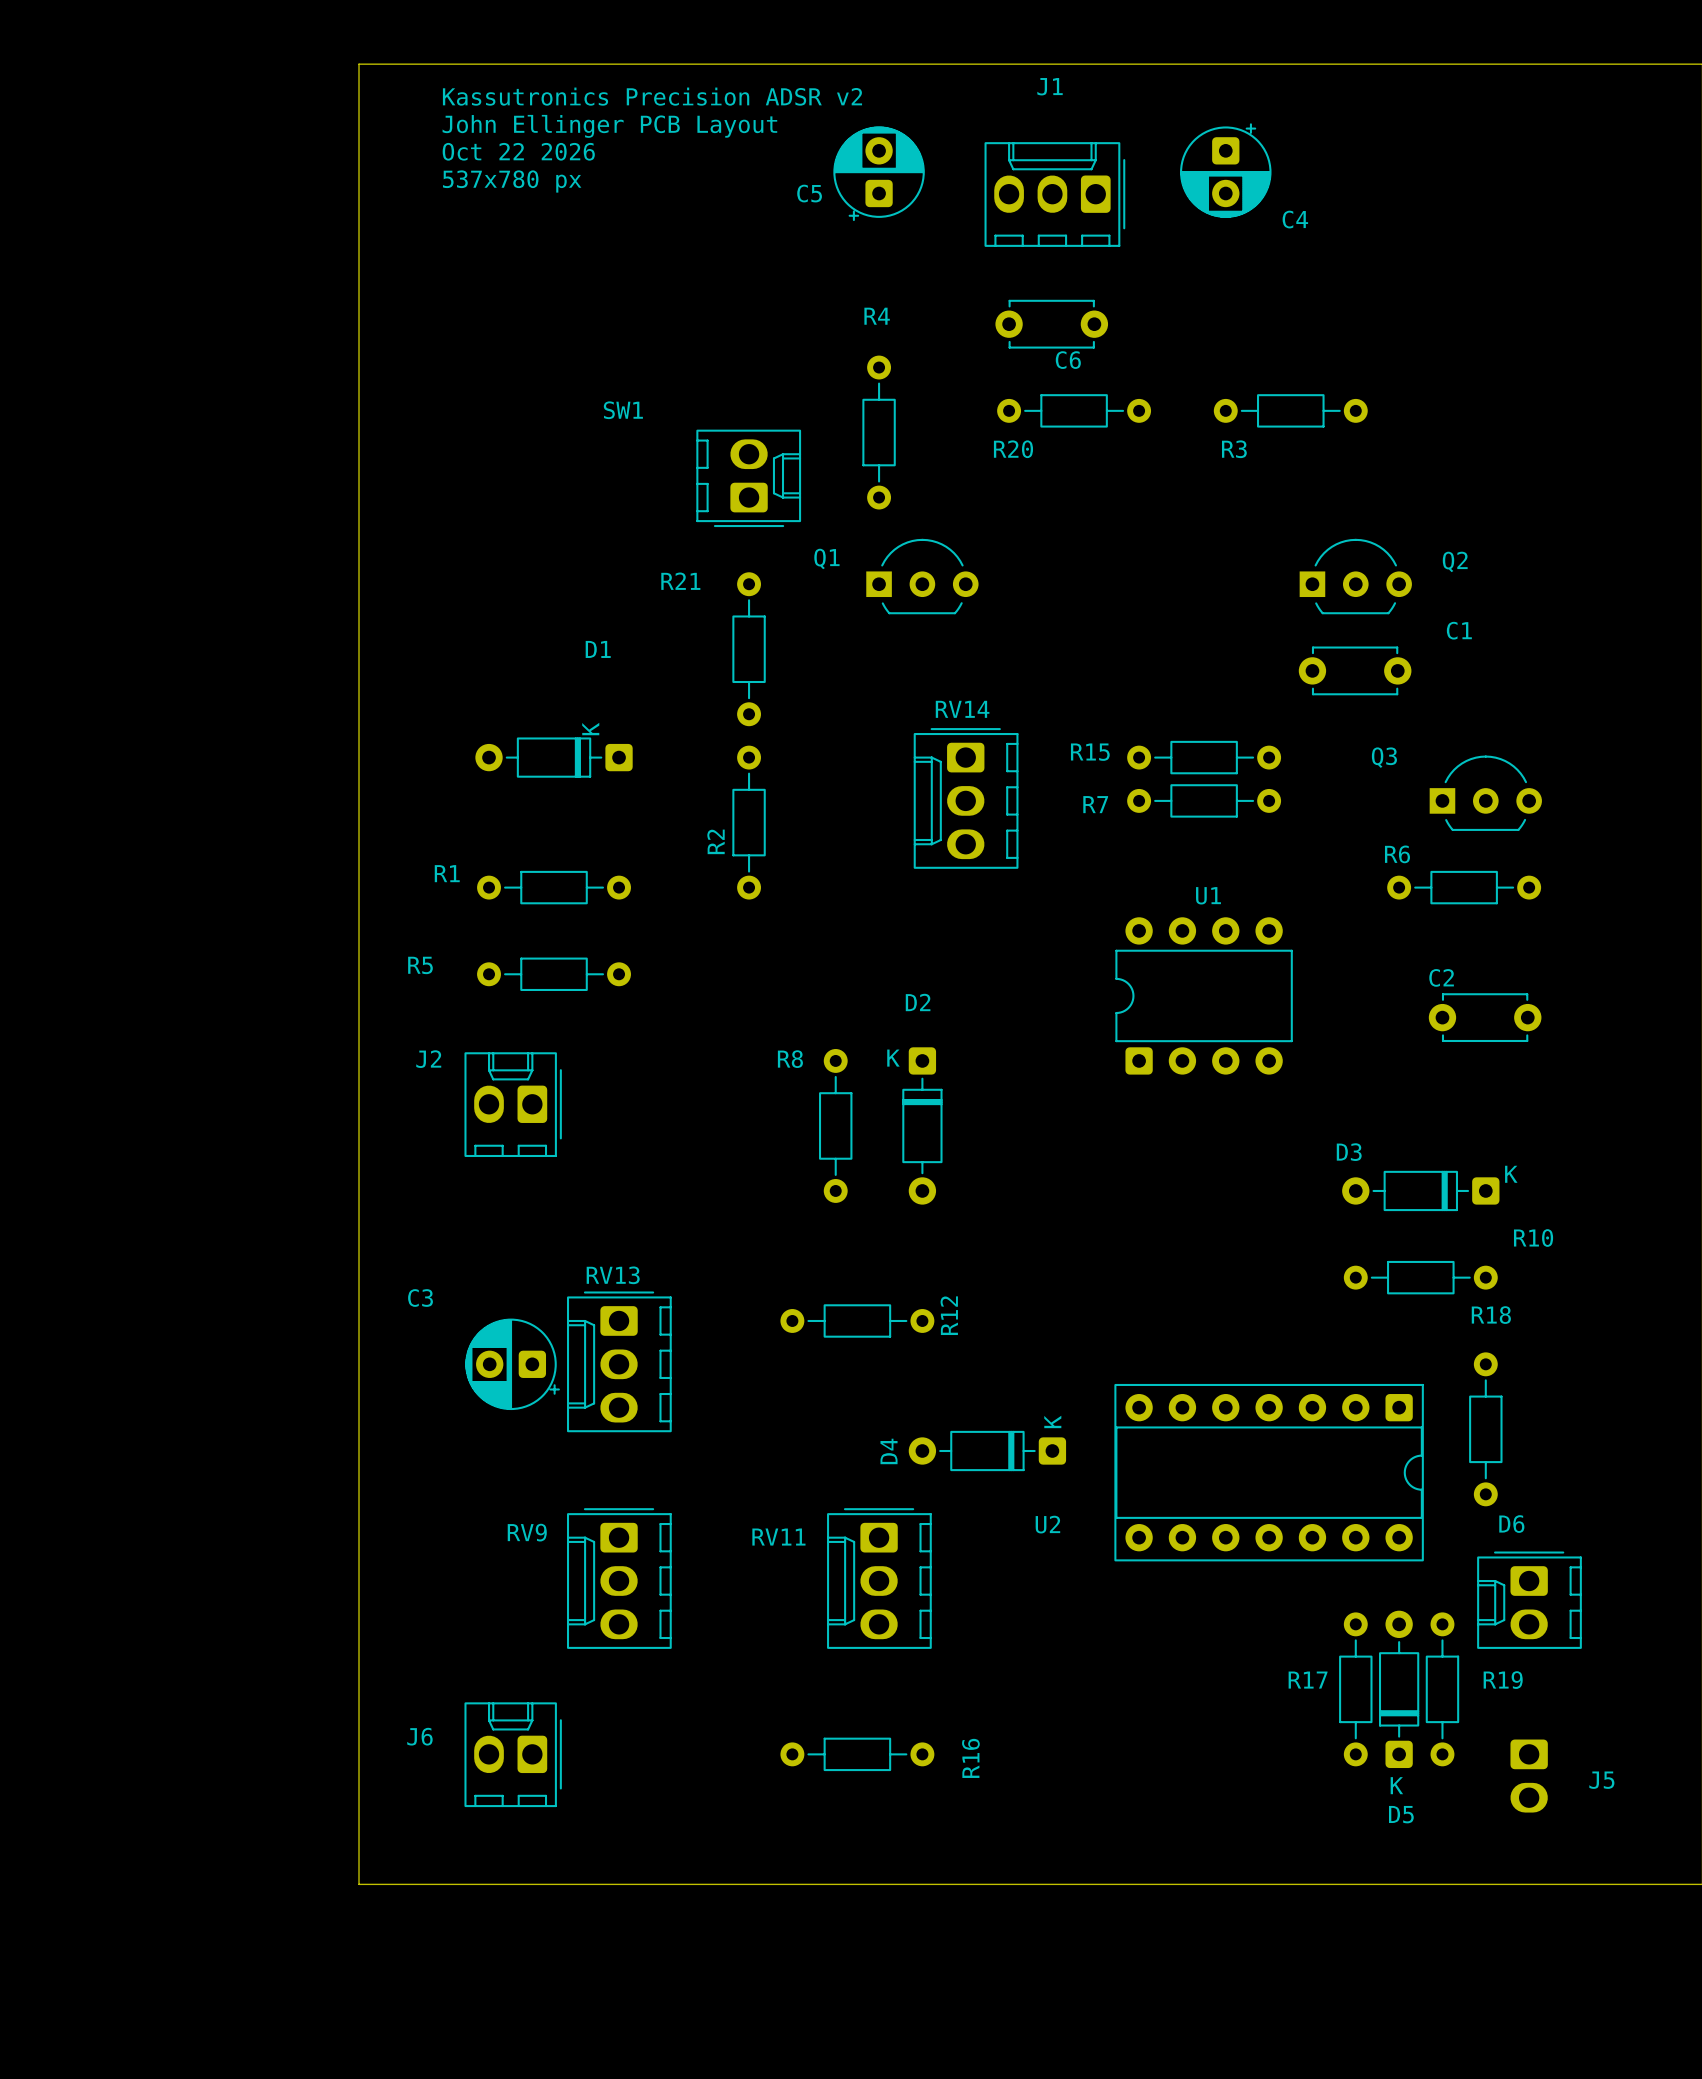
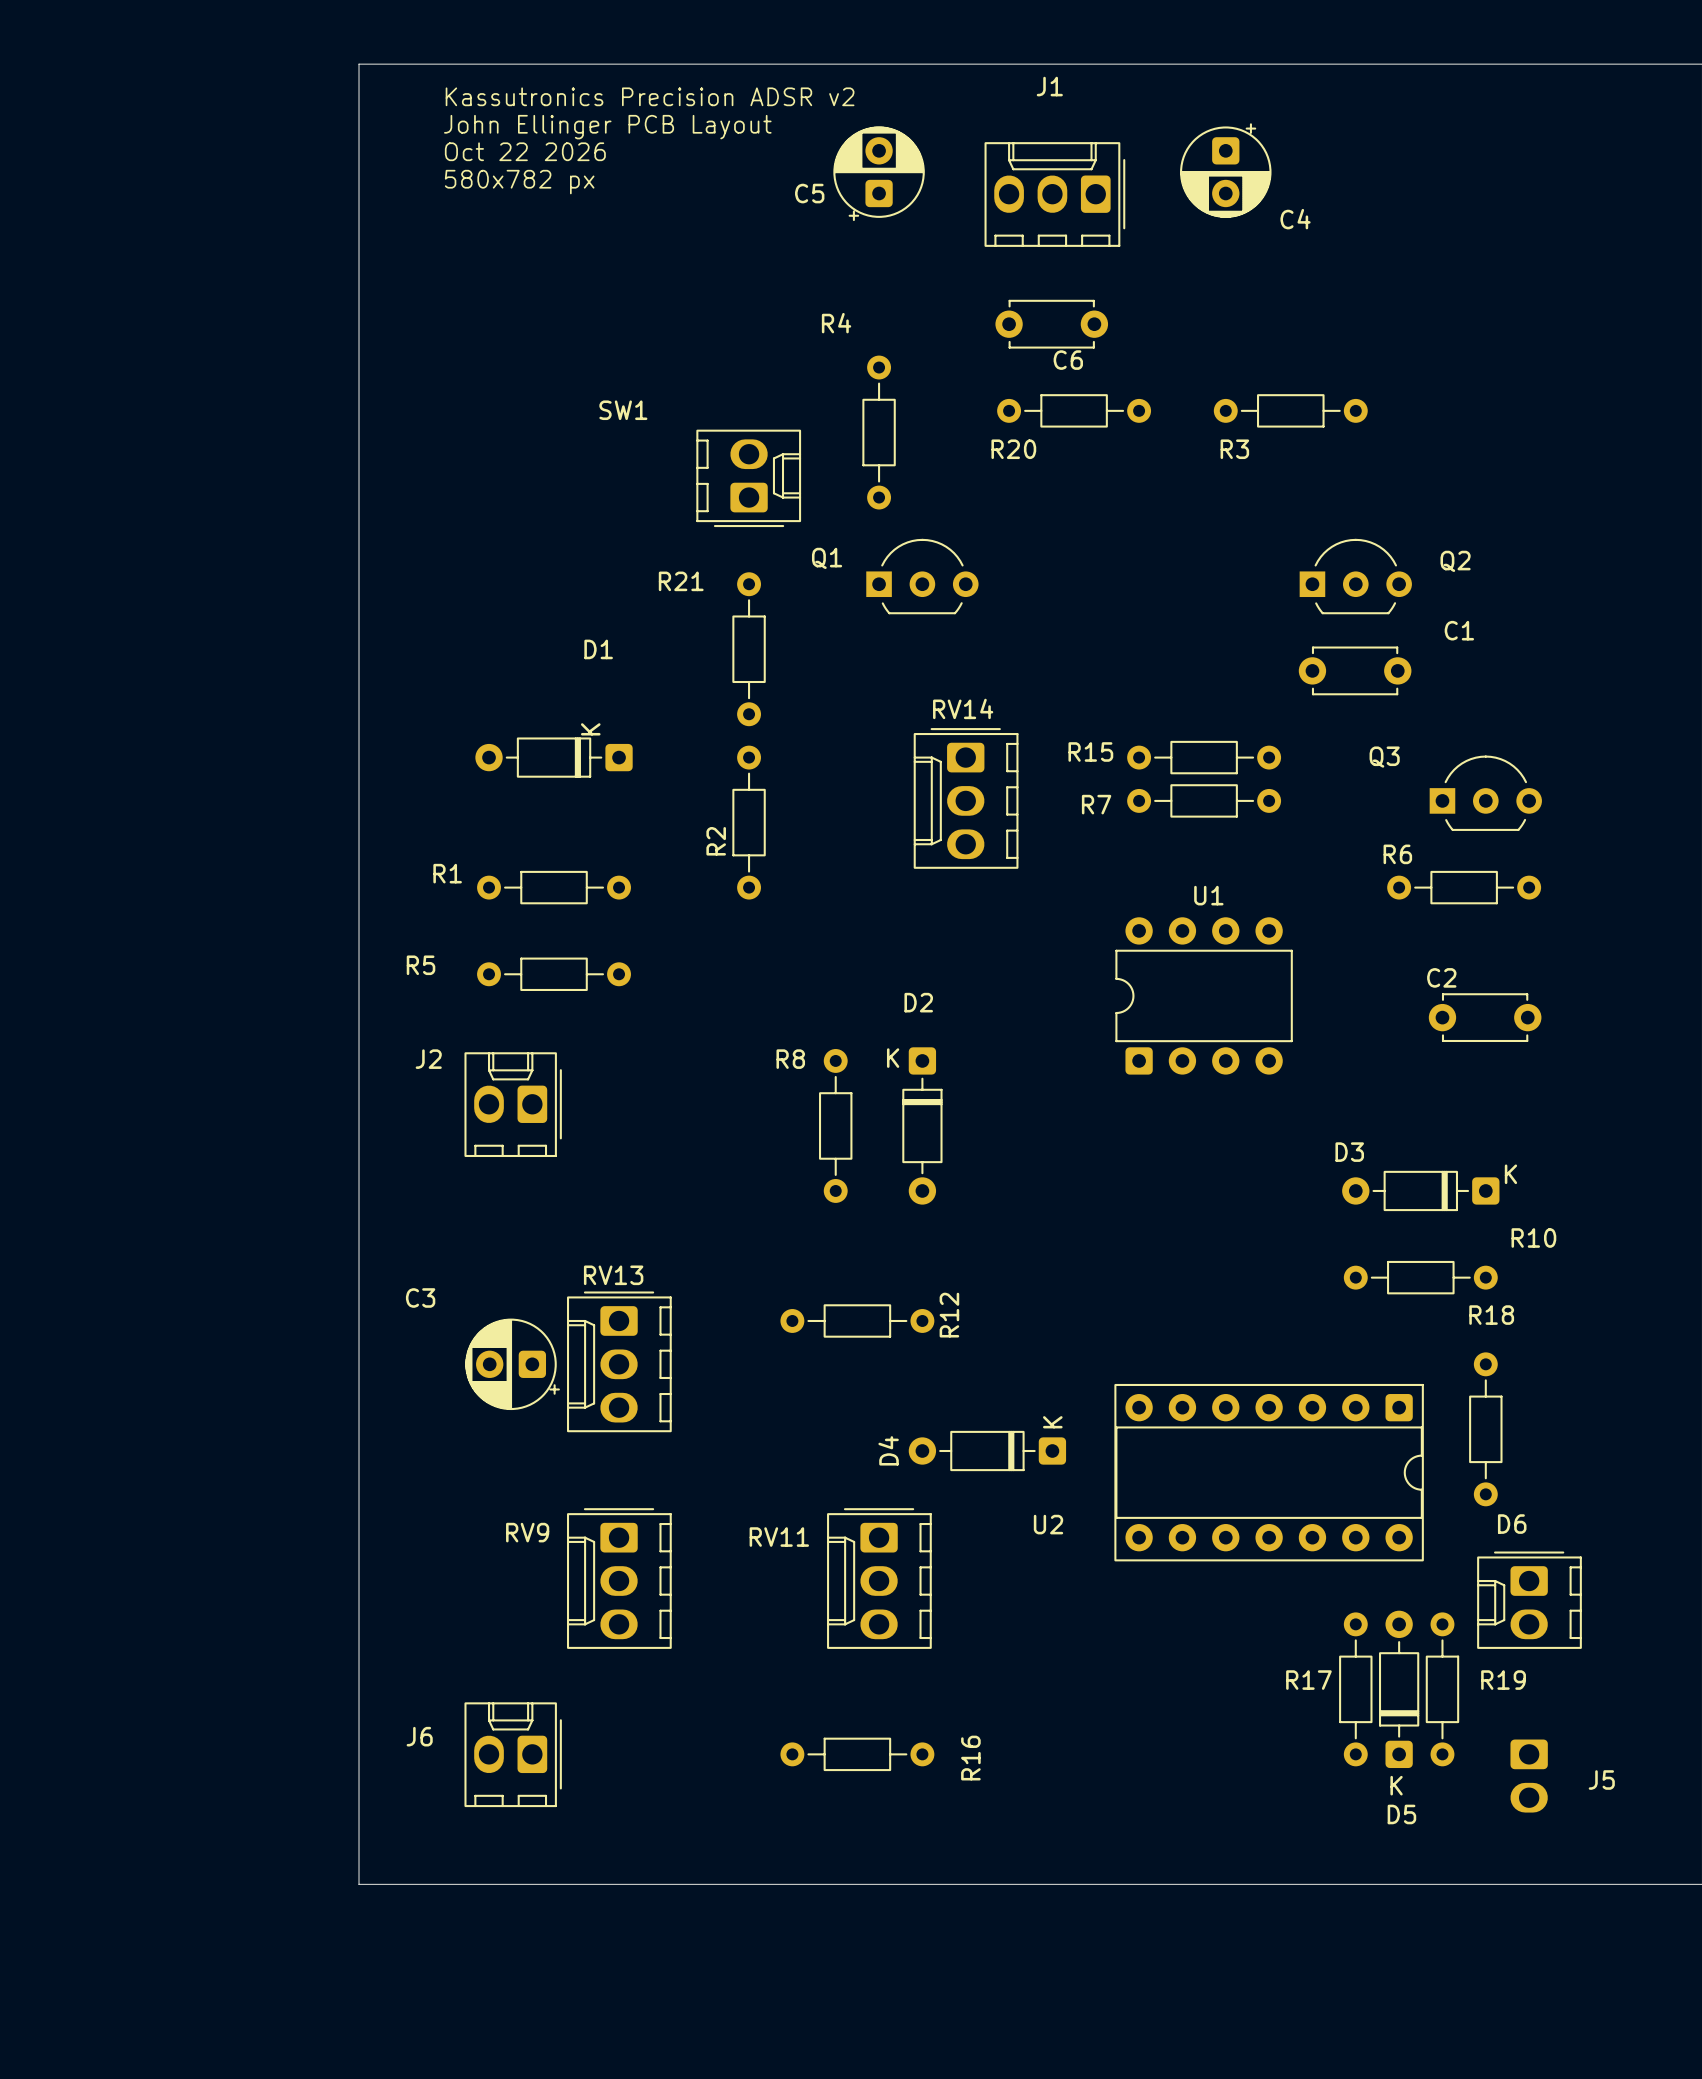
text: 537x780 px (512, 181) -> 580x782 px (519, 182)
R4 name position: R4 (877, 316) -> R4 (836, 323)

